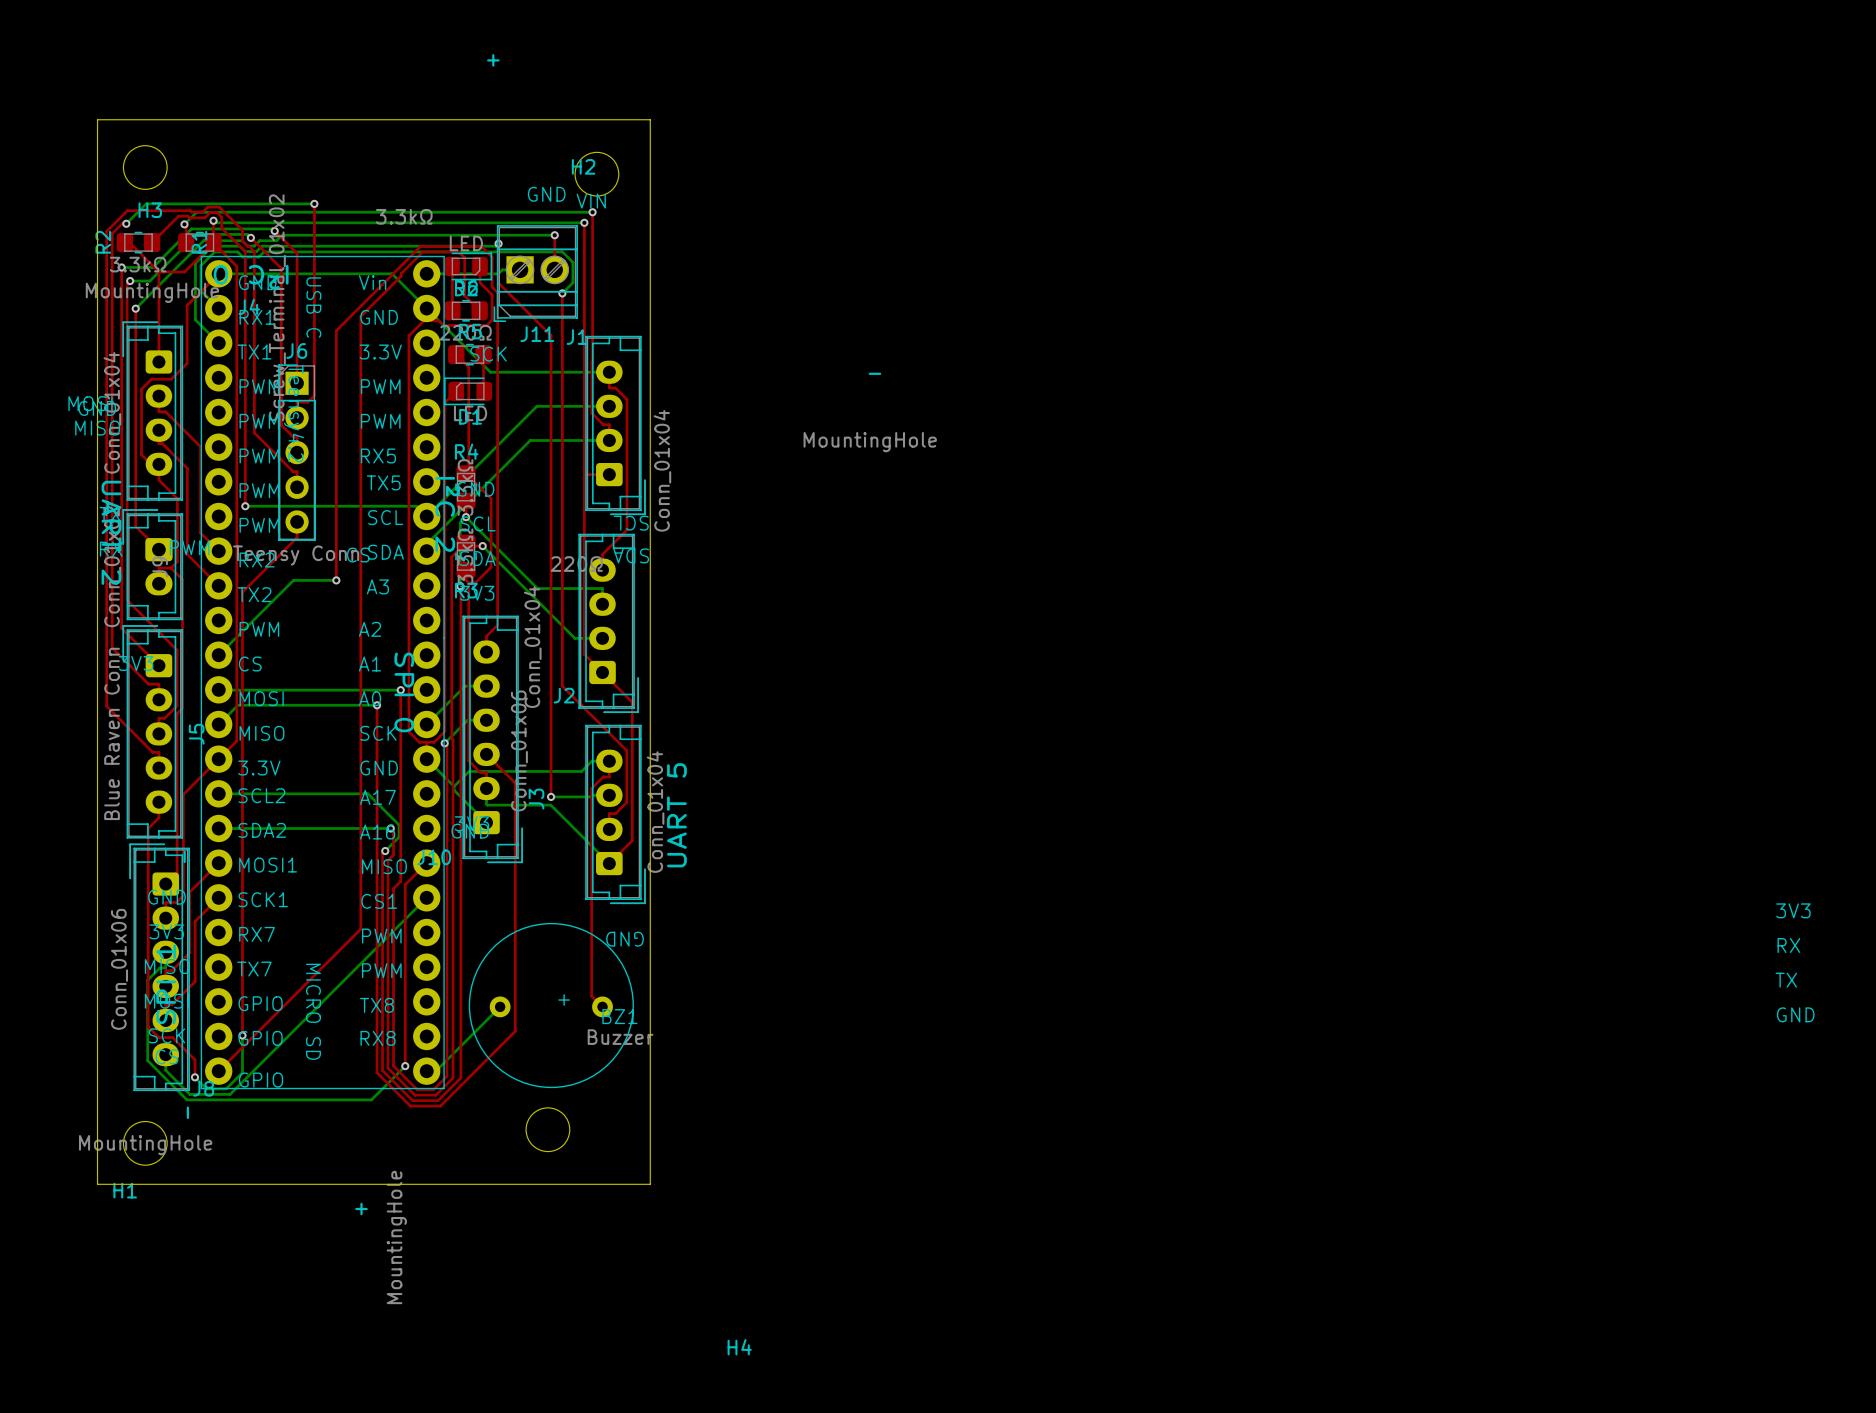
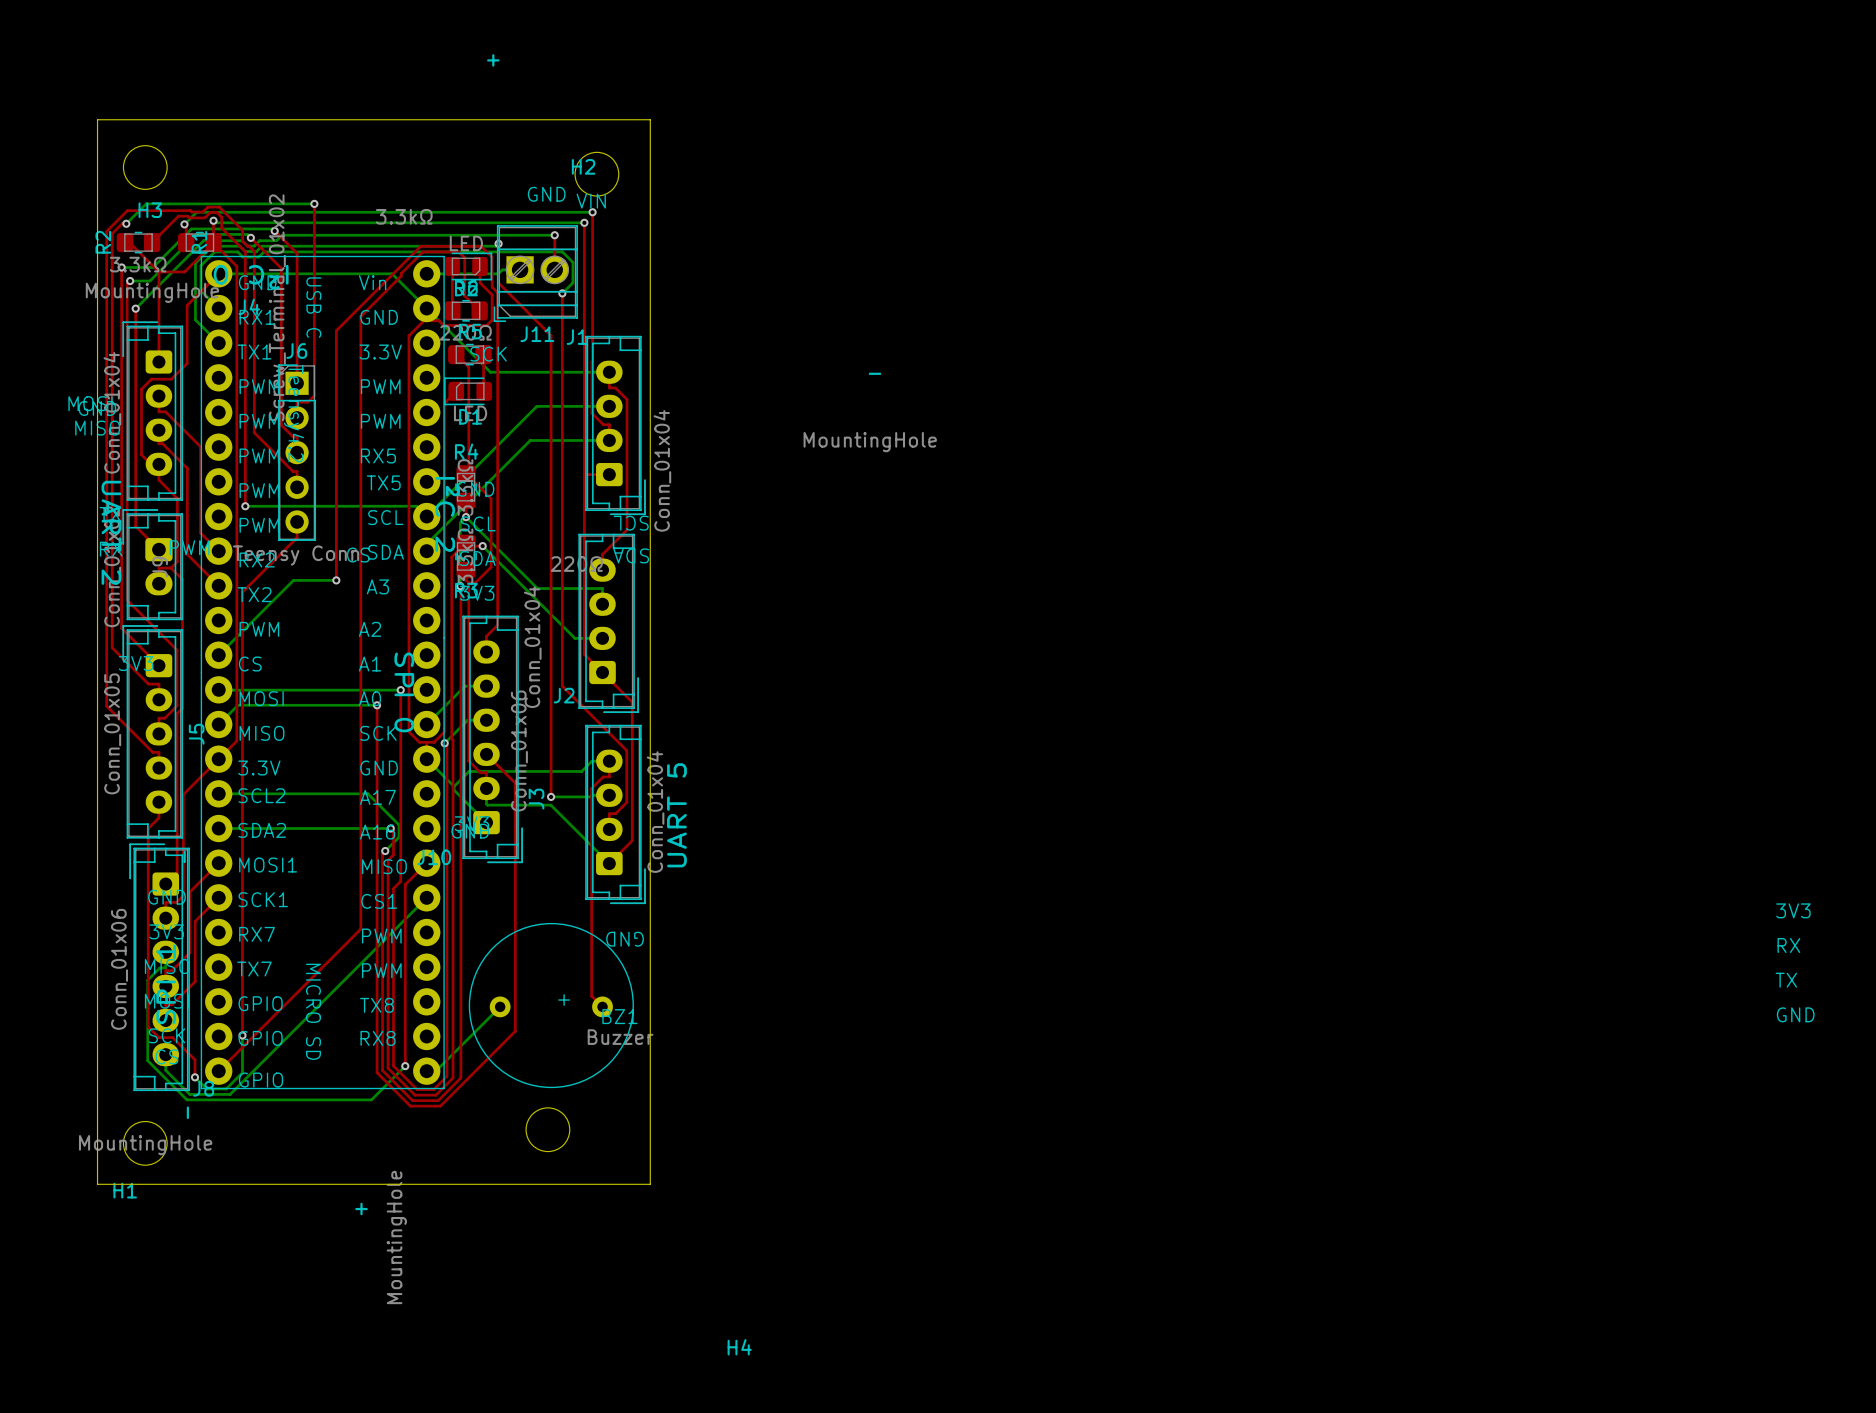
J5 value: Blue Raven Conn (112, 733) -> Conn_01x05 (112, 733)

